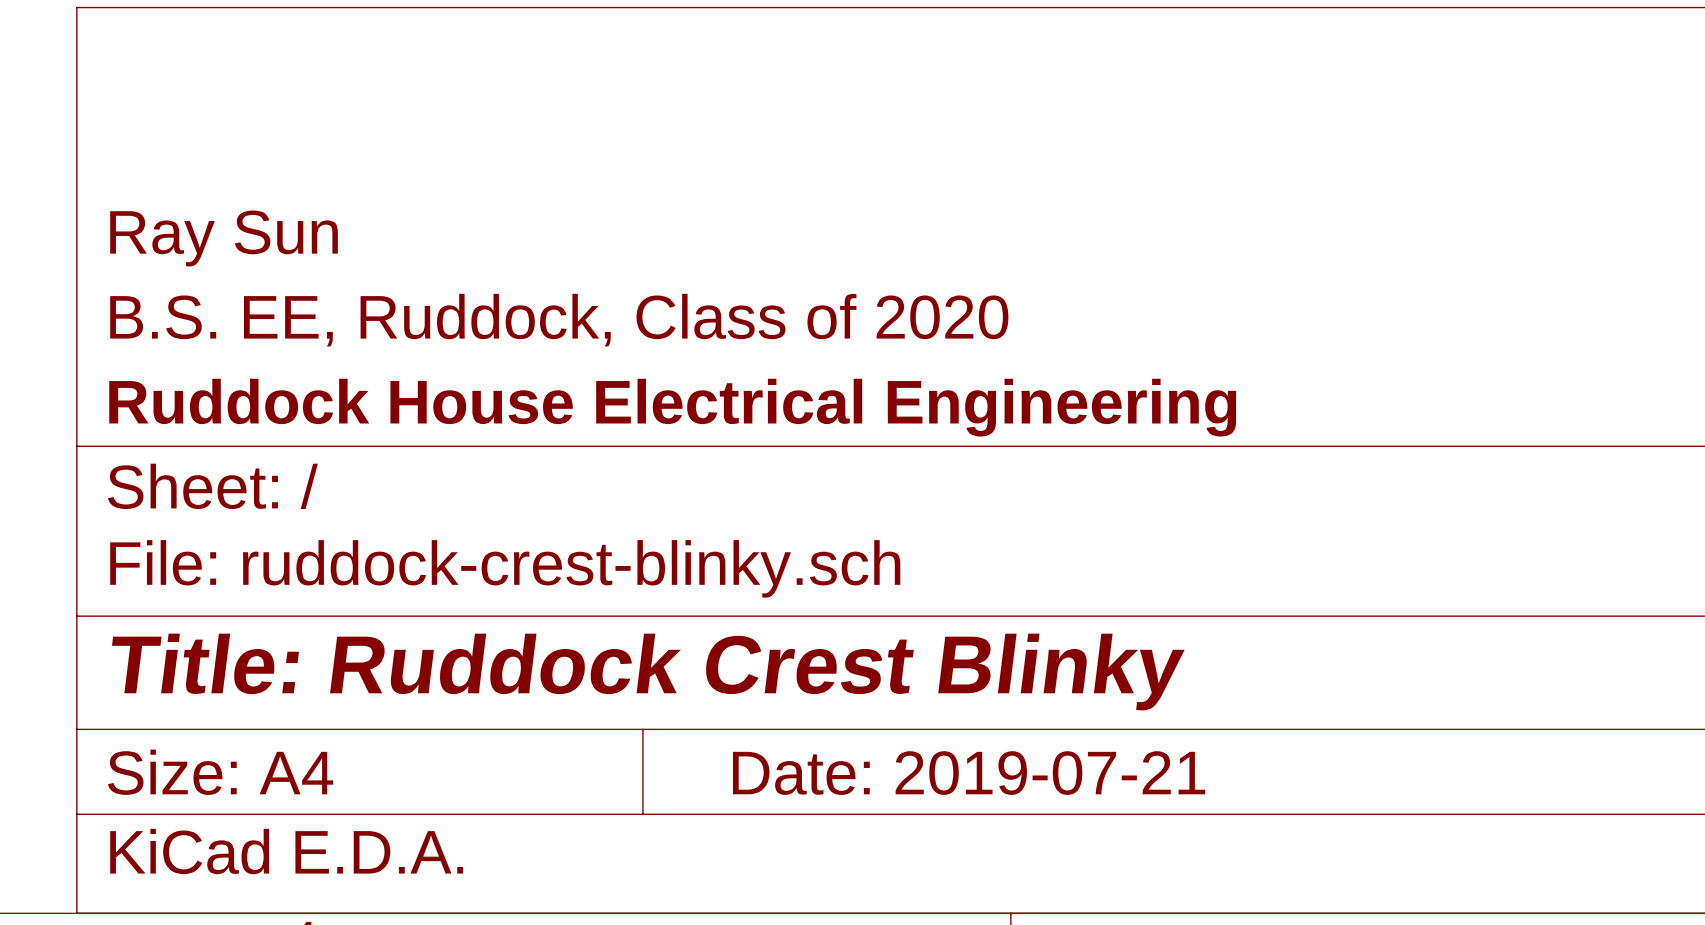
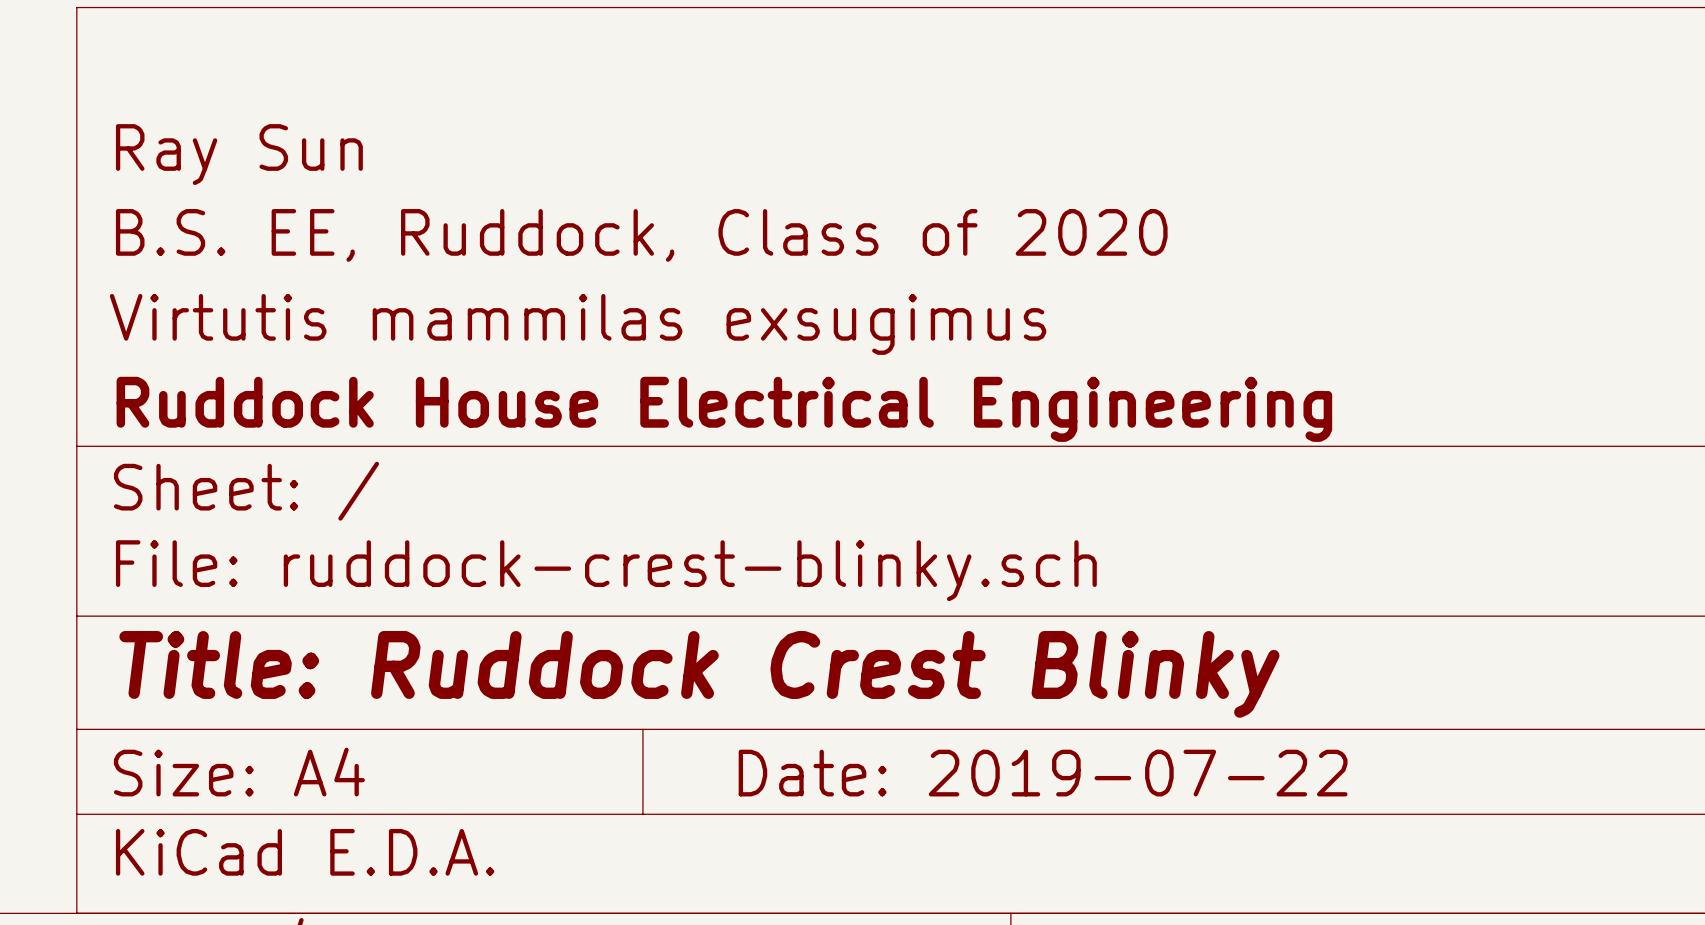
title block: none -> Ray Sun (239, 154)
title block: Ray Sun (224, 238) -> B.S. EE, Ruddock, Class of 2020 (641, 235)
title block: B.S. EE, Ruddock, Class of 2020 (559, 320) -> Virtutis mammilas exsugimus (578, 324)
title block: Date: 2019-07-21 (969, 773) -> Date: 2019-07-22 (1043, 773)

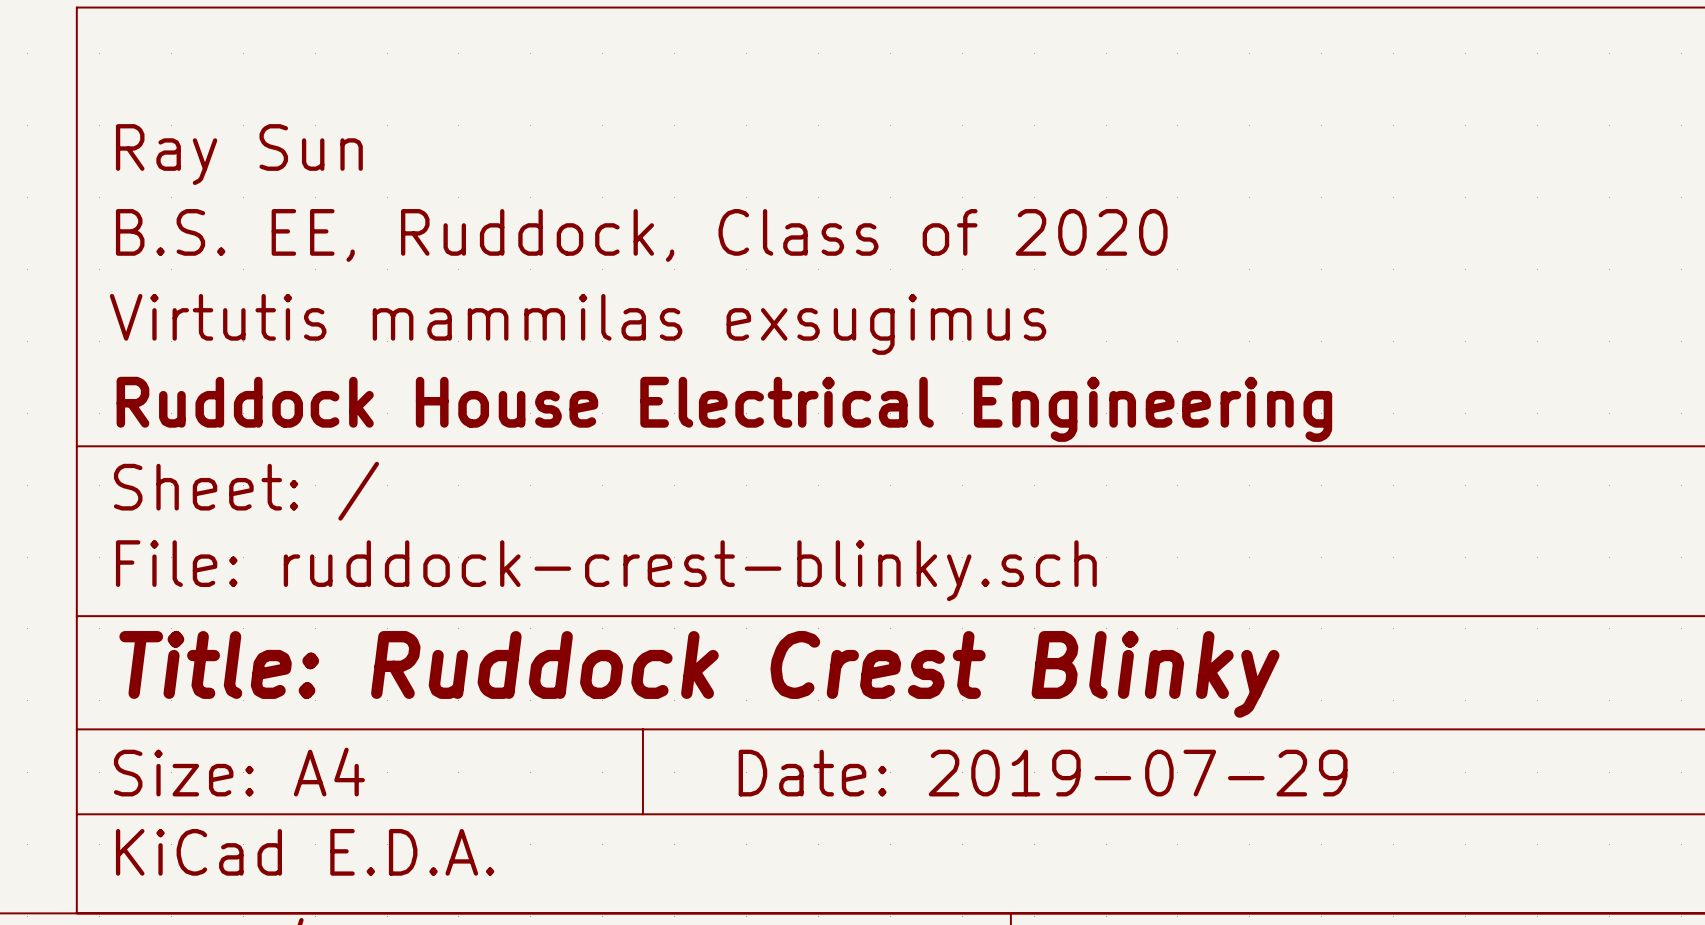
title block: Date: 2019-07-22 (1043, 773) -> Date: 2019-07-29 (1043, 773)

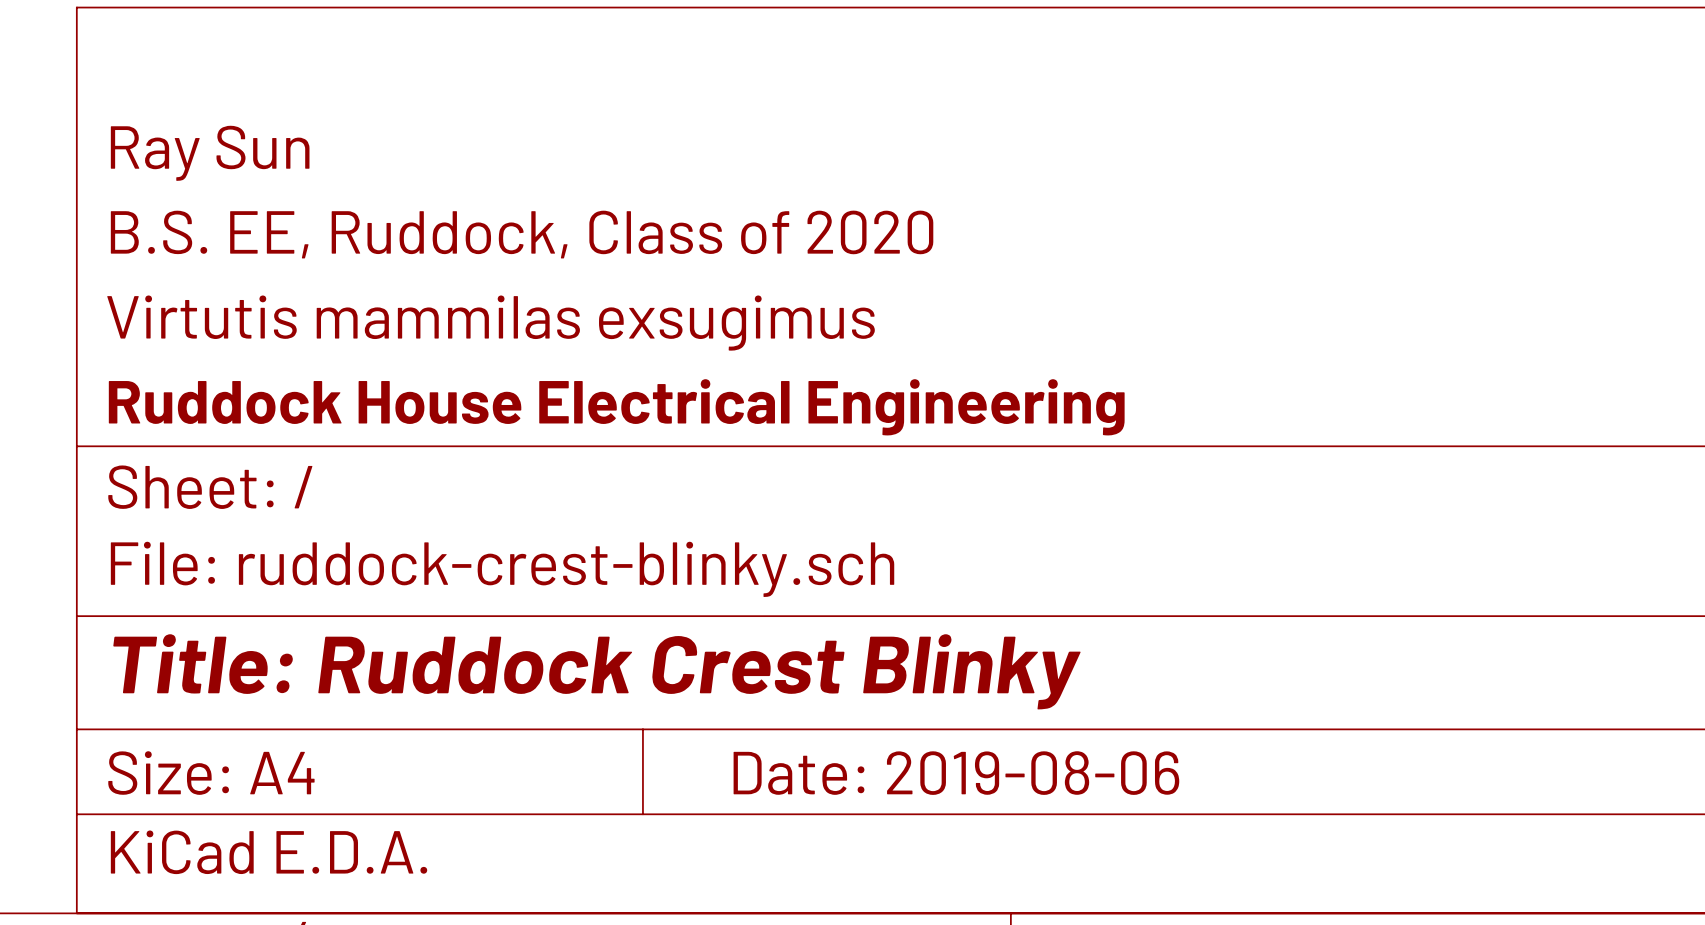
title block: Date: 2019-07-29 (1043, 773) -> Date: 2019-08-06 (956, 773)

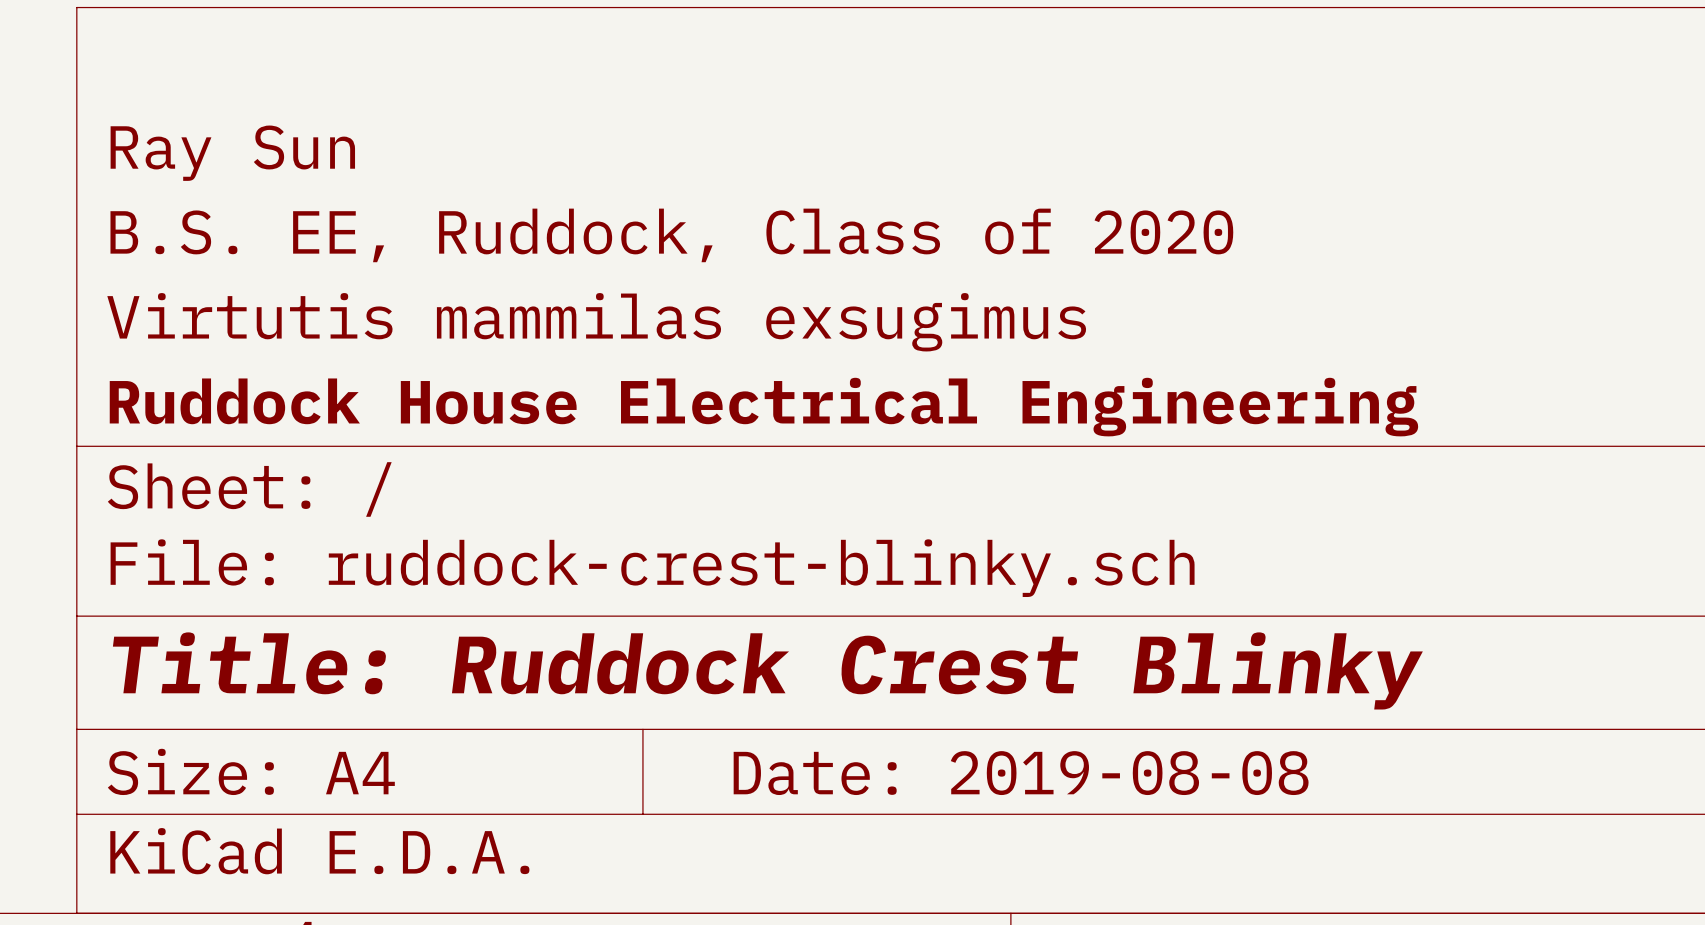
title block: Date: 2019-08-06 (956, 773) -> Date: 2019-08-08 (1021, 773)

